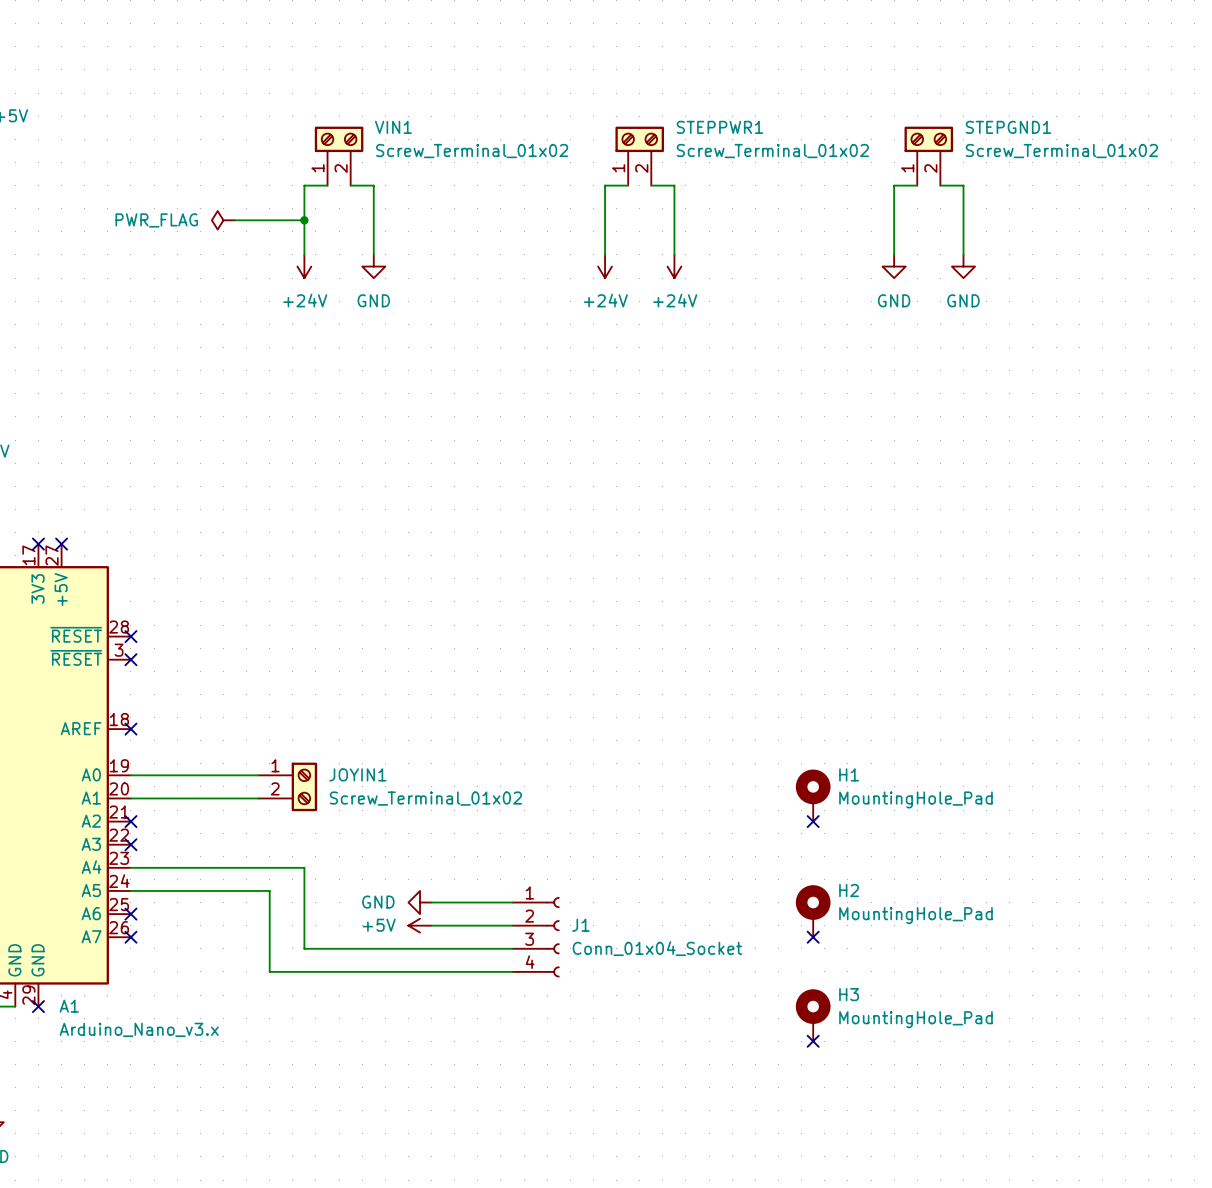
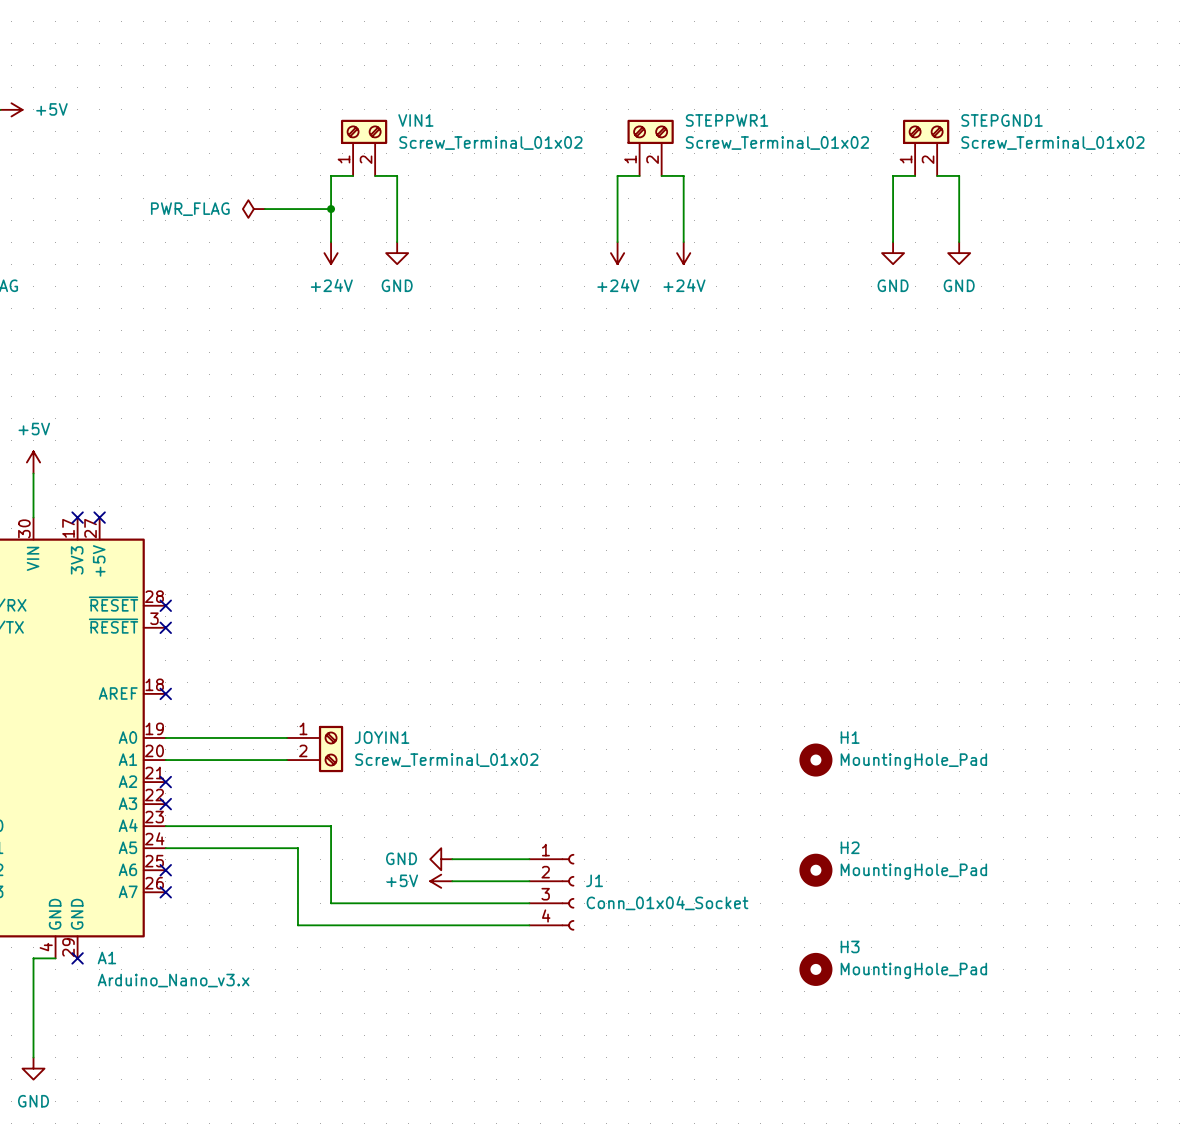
H1 symbol: [795, 769, 831, 822] -> [799, 743, 833, 777]
no-connect mark: (813, 821) -> none
H2 symbol: [795, 885, 831, 938] -> [799, 853, 833, 887]
no-connect mark: (813, 937) -> none
H3 symbol: [795, 989, 831, 1042] -> [799, 952, 833, 986]
no-connect mark: (813, 1041) -> none

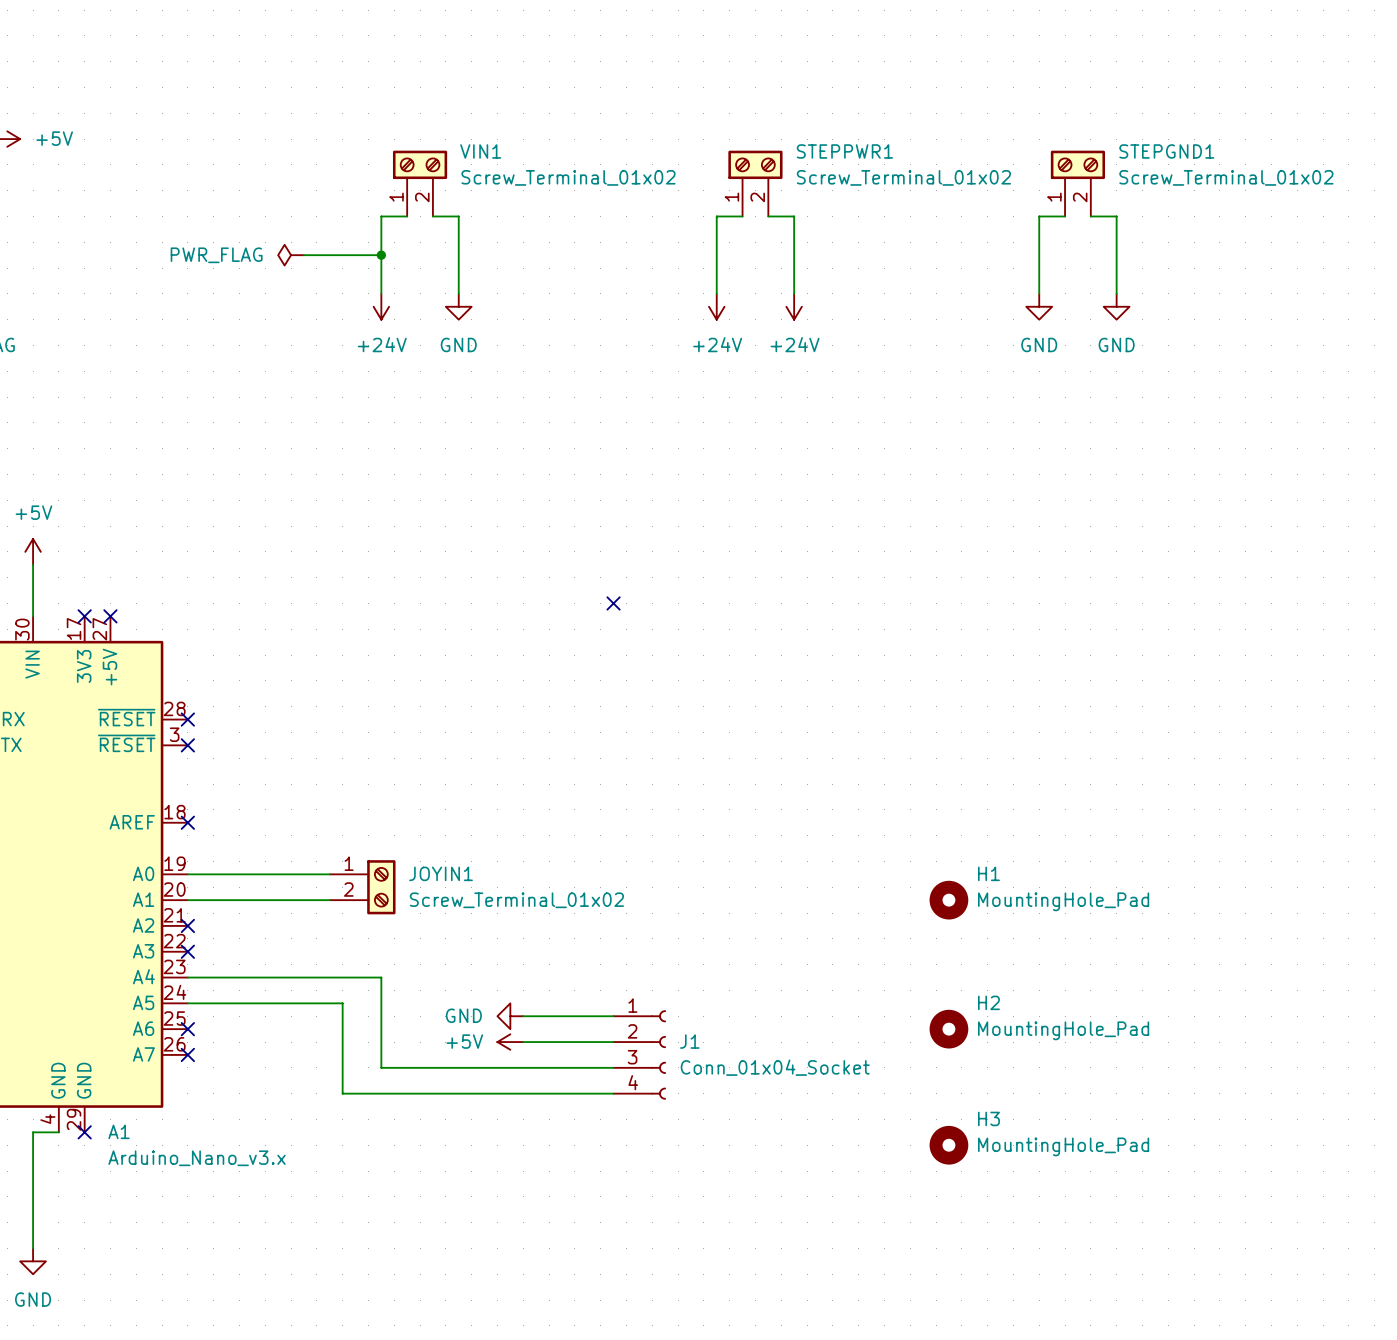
no-connect mark: none -> (613, 603)

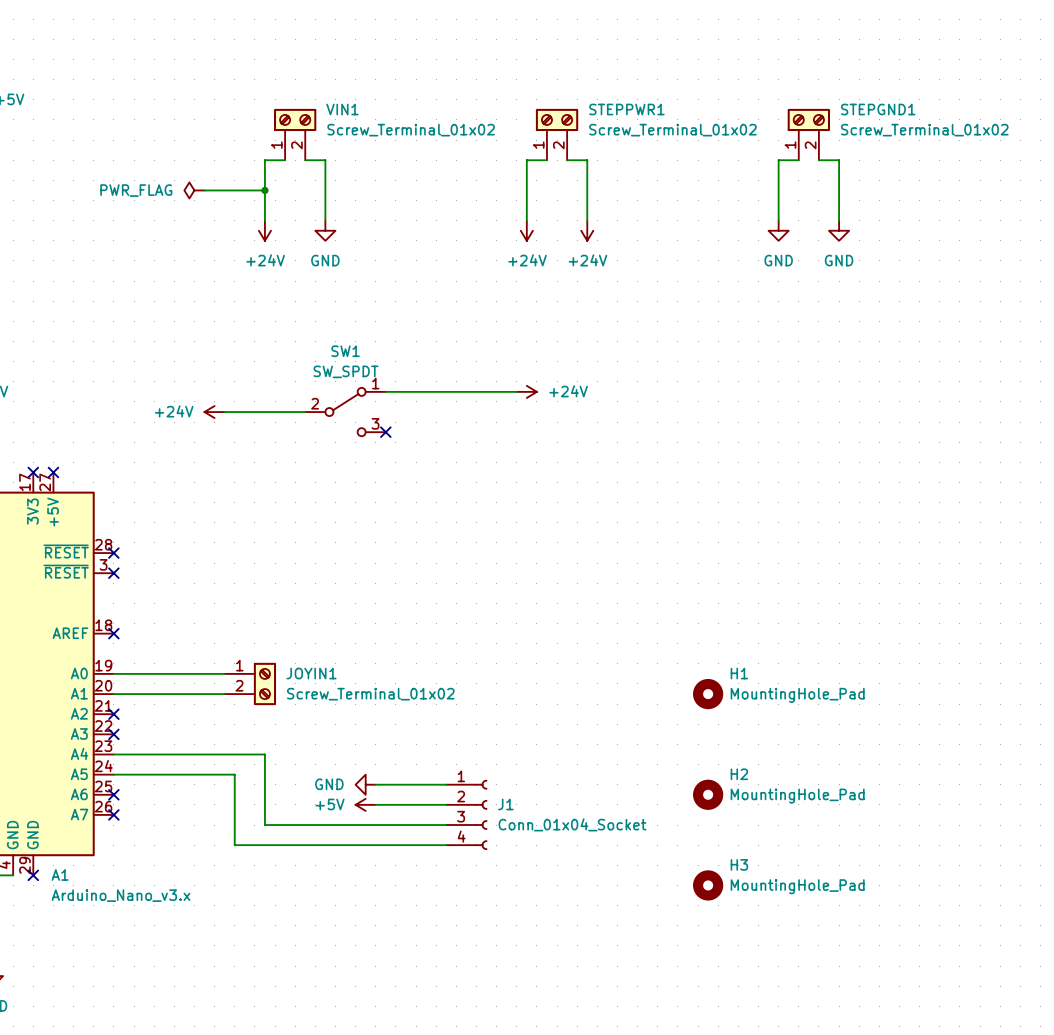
wire: none -> (385, 391) (516, 391)
power symbol: none -> +24V (526, 391)
power symbol: none -> +24V (214, 412)
wire: none -> (224, 412) (305, 412)
SW1: none -> SW_SPDT (345, 412)
no-connect mark: none -> (385, 432)
no-connect mark: (613, 603) -> none

